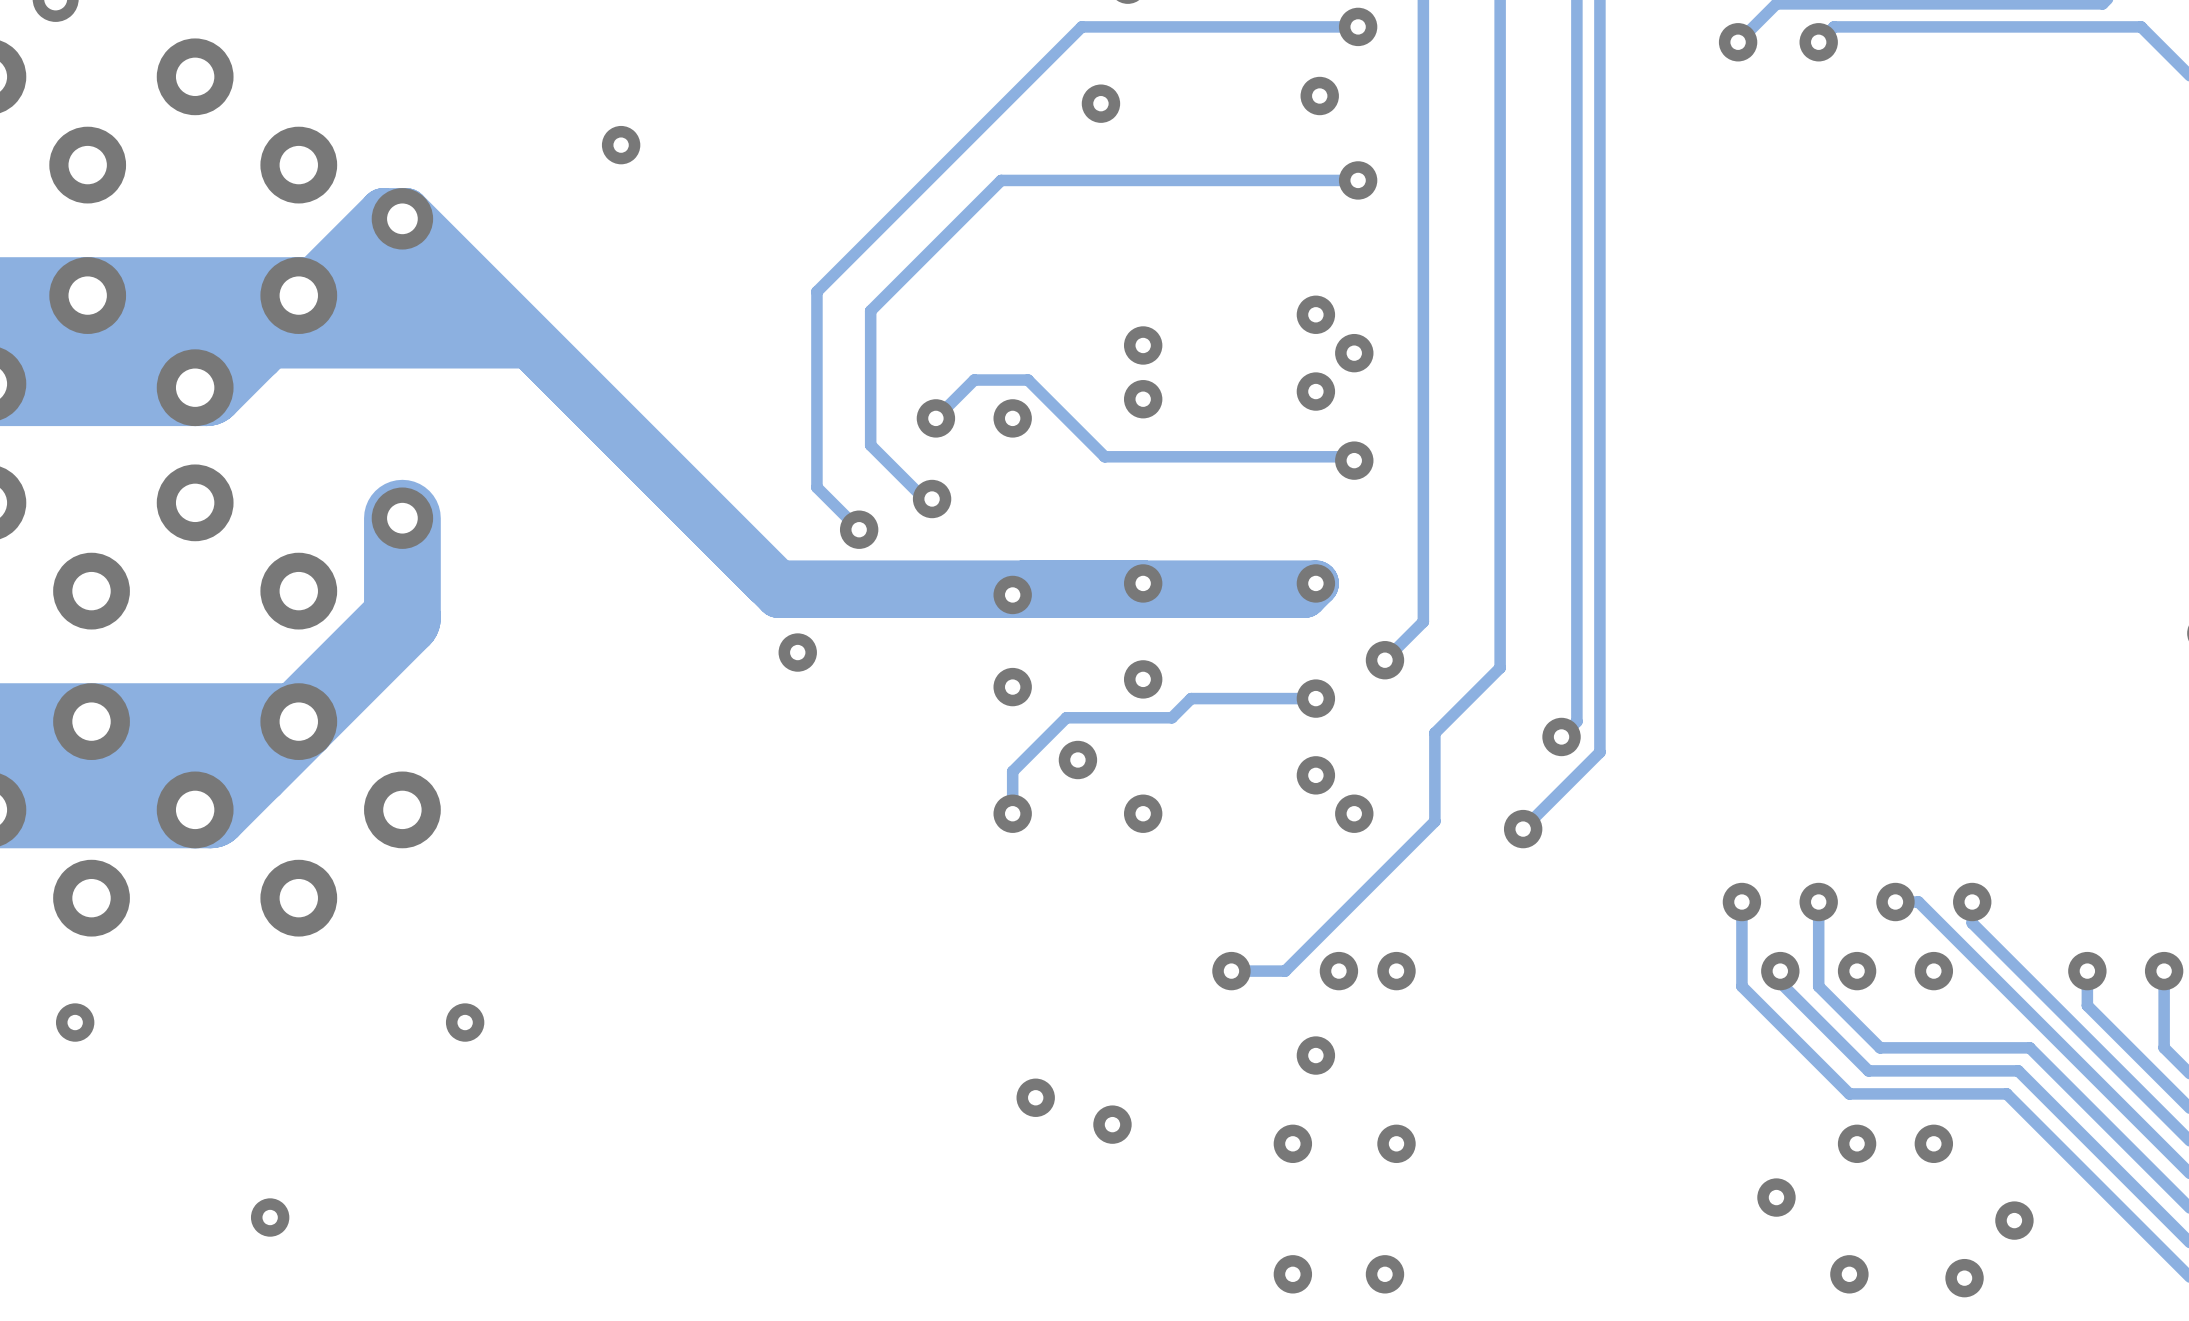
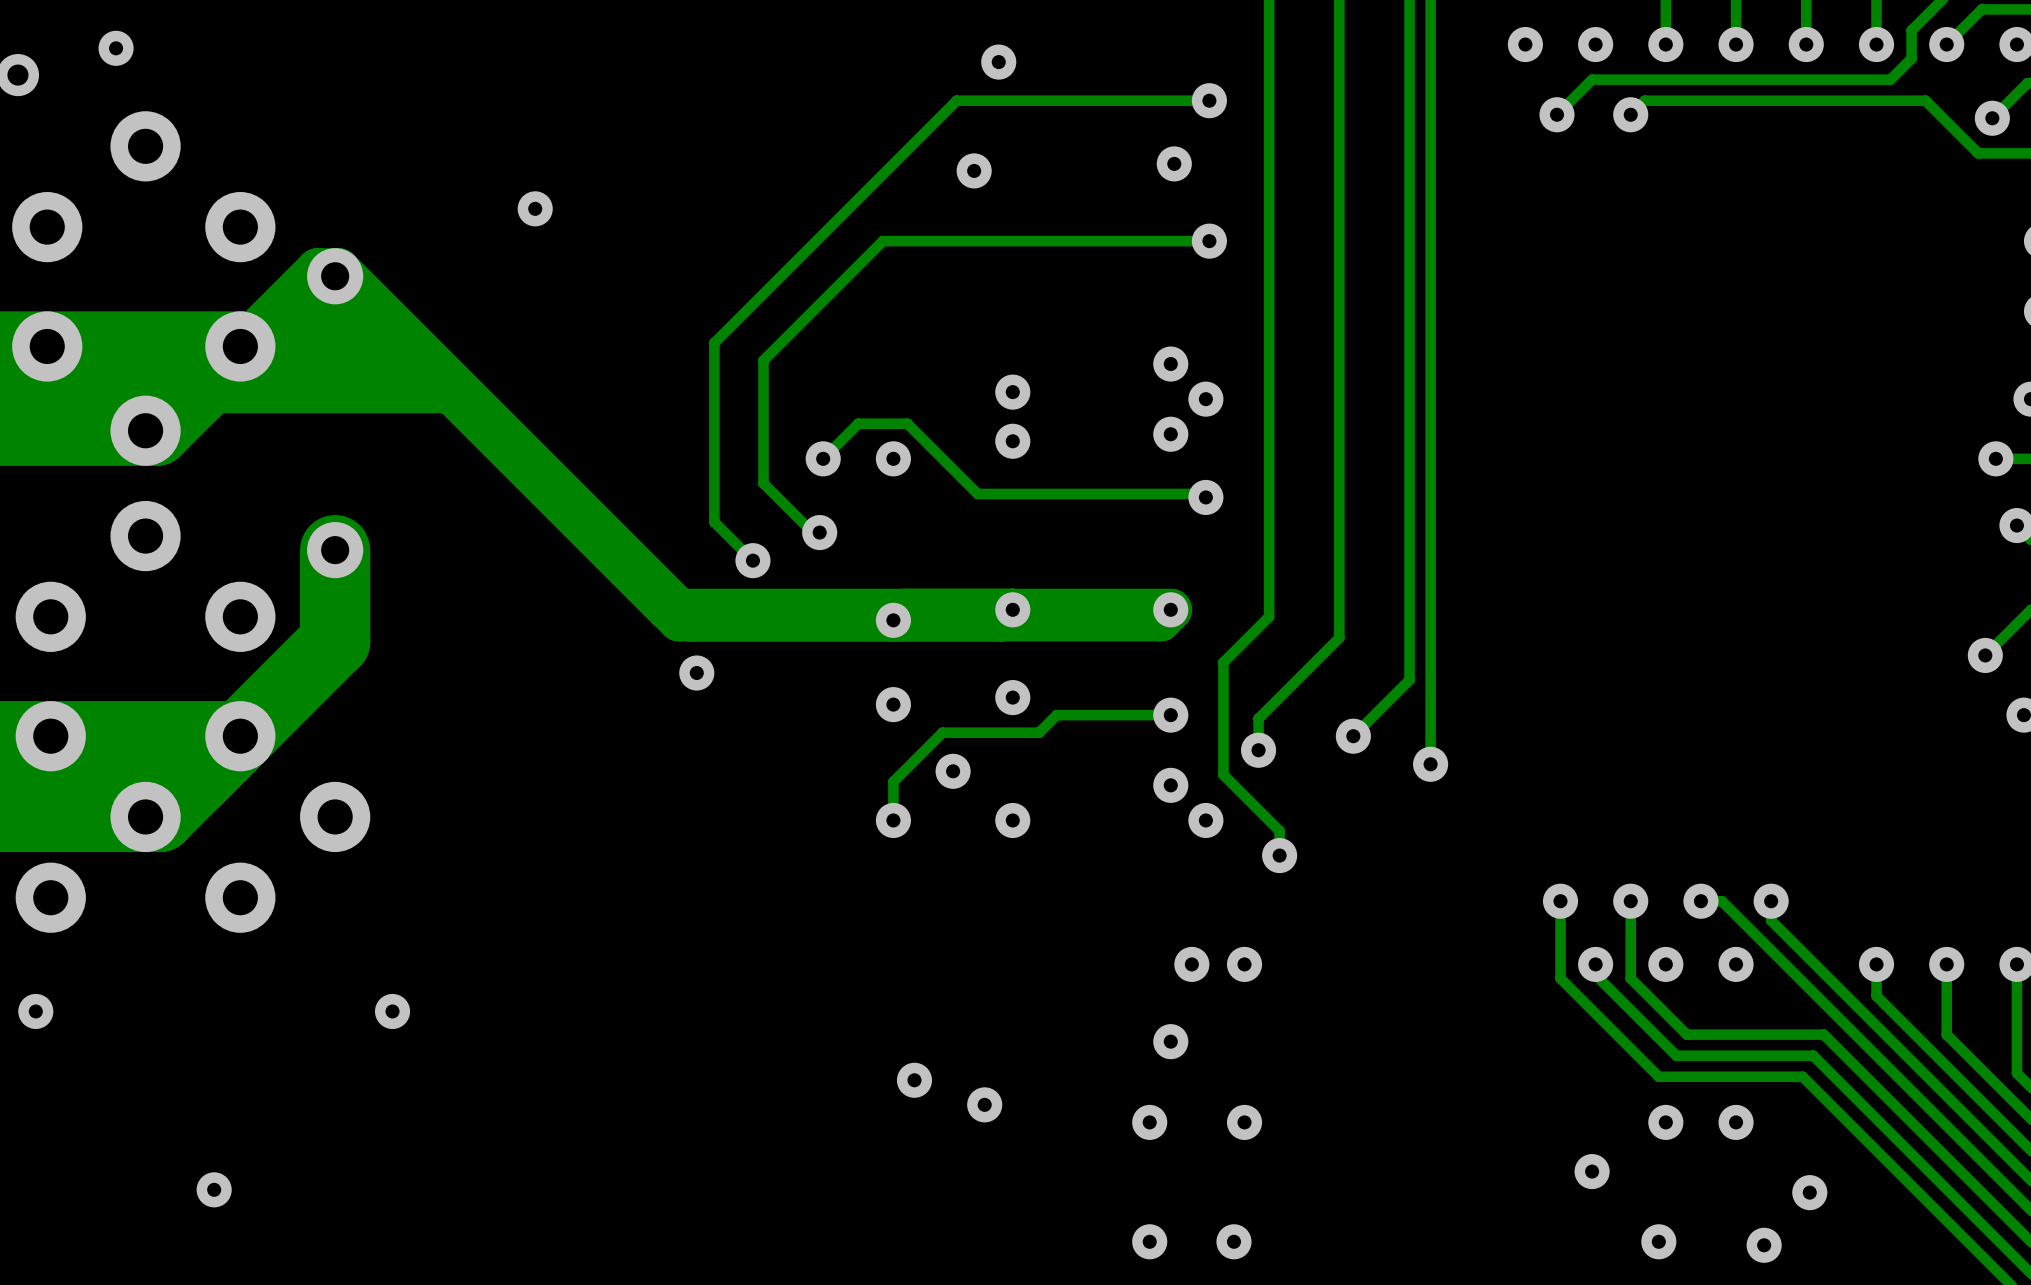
track: (1423, 591) (1423, 621) (1384, 660) -> (1269, 616) (1223, 662) (1223, 774) (1279, 831) (1279, 855)
track: (1500, 614) (1500, 667) (1434, 733) (1434, 821) (1285, 971) (1231, 971) -> (1339, 637) (1258, 718) (1258, 750)
via: (1384, 660) -> none
track: (1576, 660) (1576, 721) (1561, 736) -> (1409, 680) (1353, 736)
via: none -> (1353, 736)
via: none -> (1258, 750)
via position: (1561, 736) -> (1430, 764)
track: (1599, 752) (1523, 829) -> none
via: (1523, 829) -> none
via: none -> (1279, 855)
via: (1231, 971) -> none

